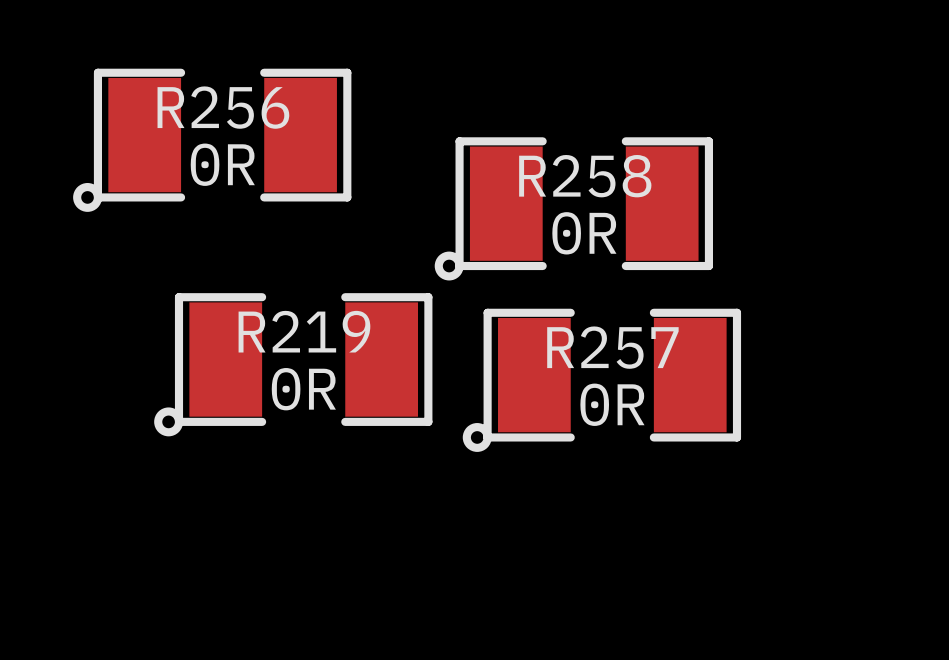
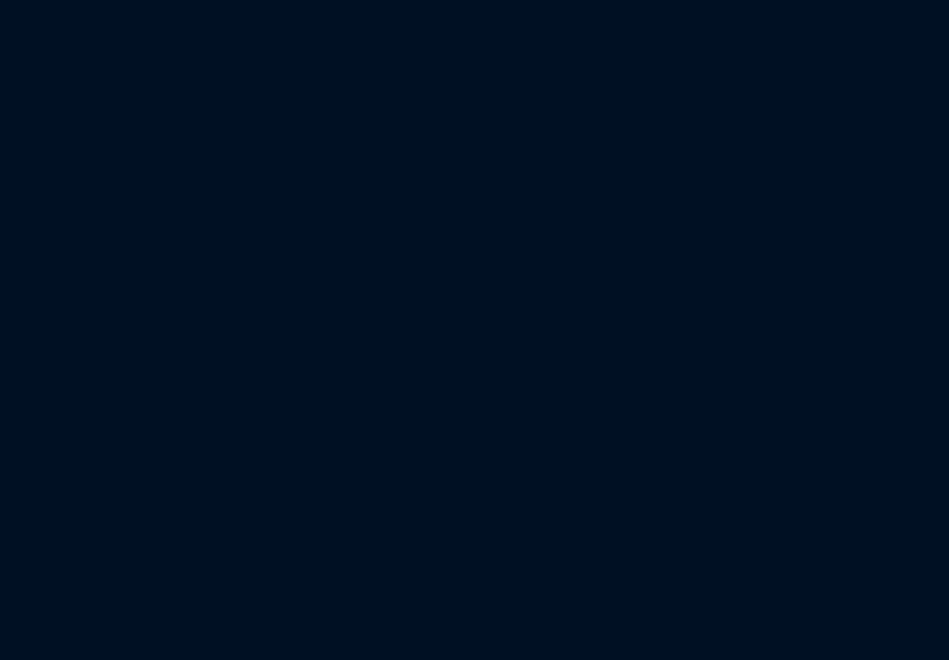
R256: 0R (212, 140) -> none
R258: 0R (573, 208) -> none
R219: 0R (293, 364) -> none
R257: 0R (601, 380) -> none

